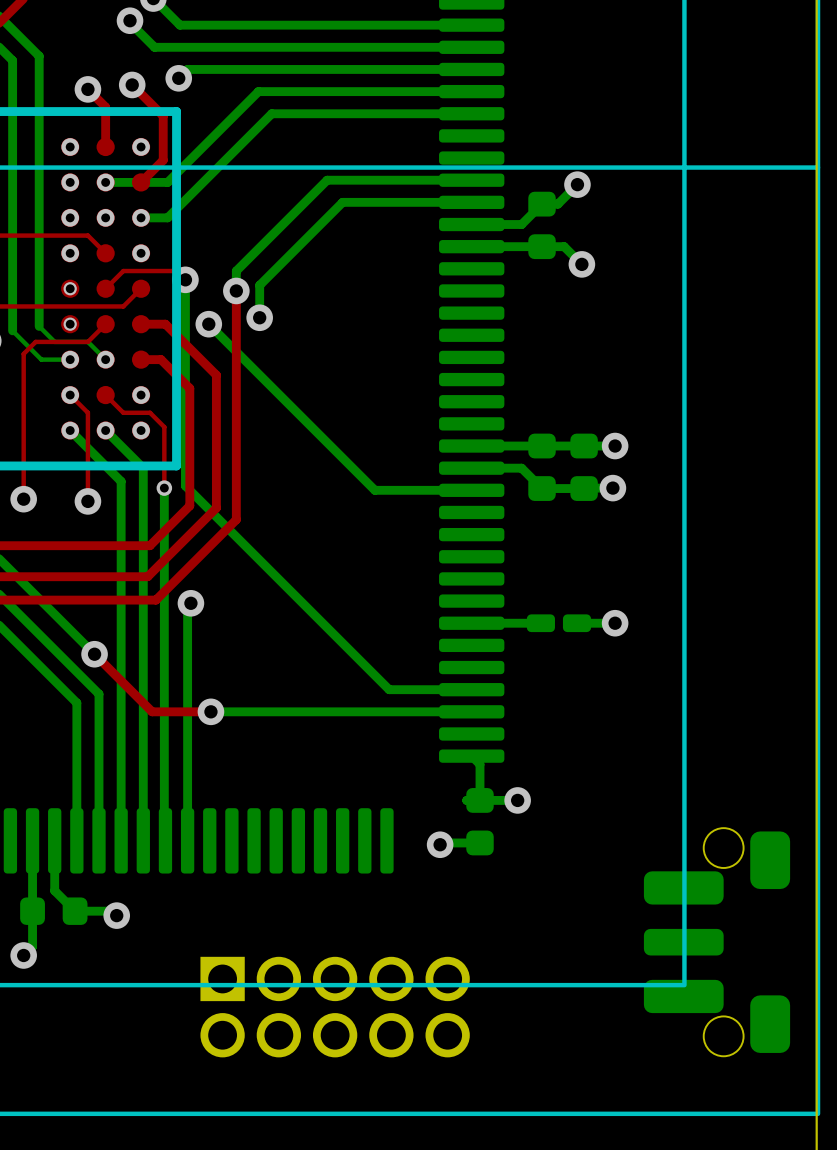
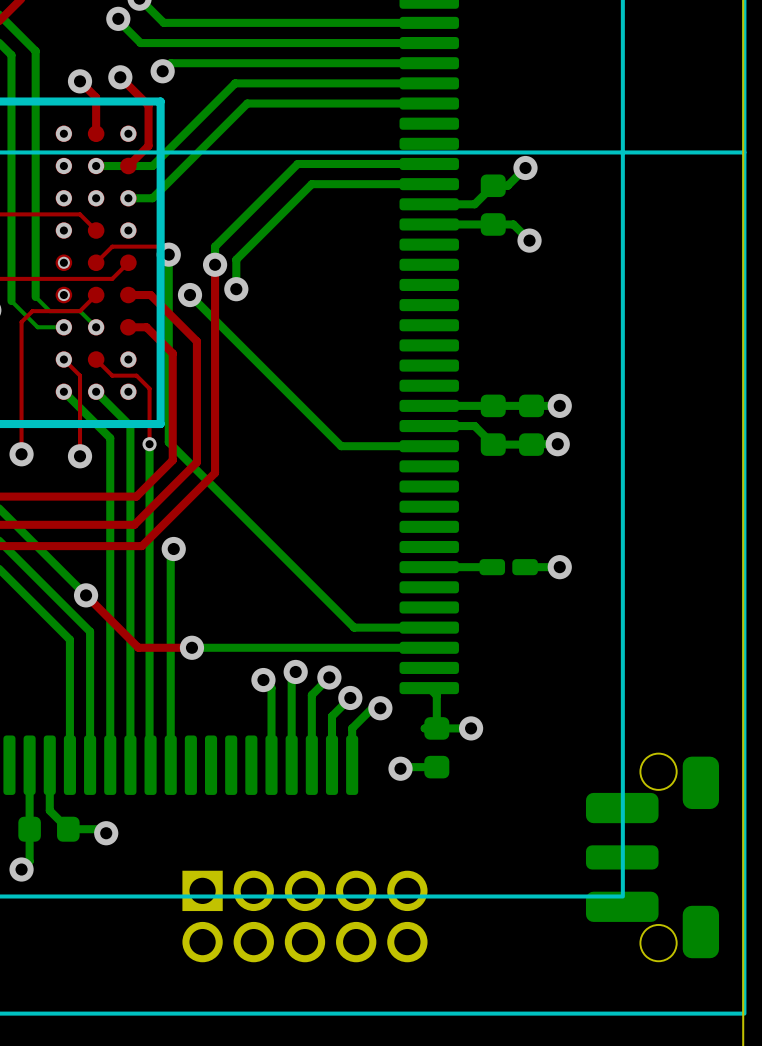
bottom track: none -> (295, 671) (291, 676) (291, 765)
via: none -> (295, 671)
bottom track: none -> (329, 677) (311, 695) (311, 765)
via: none -> (329, 677)
bottom track: none -> (263, 680) (271, 688) (271, 765)
via: none -> (263, 680)
bottom track: none -> (350, 697) (331, 716) (331, 765)
via: none -> (350, 697)
bottom track: none -> (380, 708) (372, 708) (352, 728) (352, 765)
via: none -> (380, 708)

